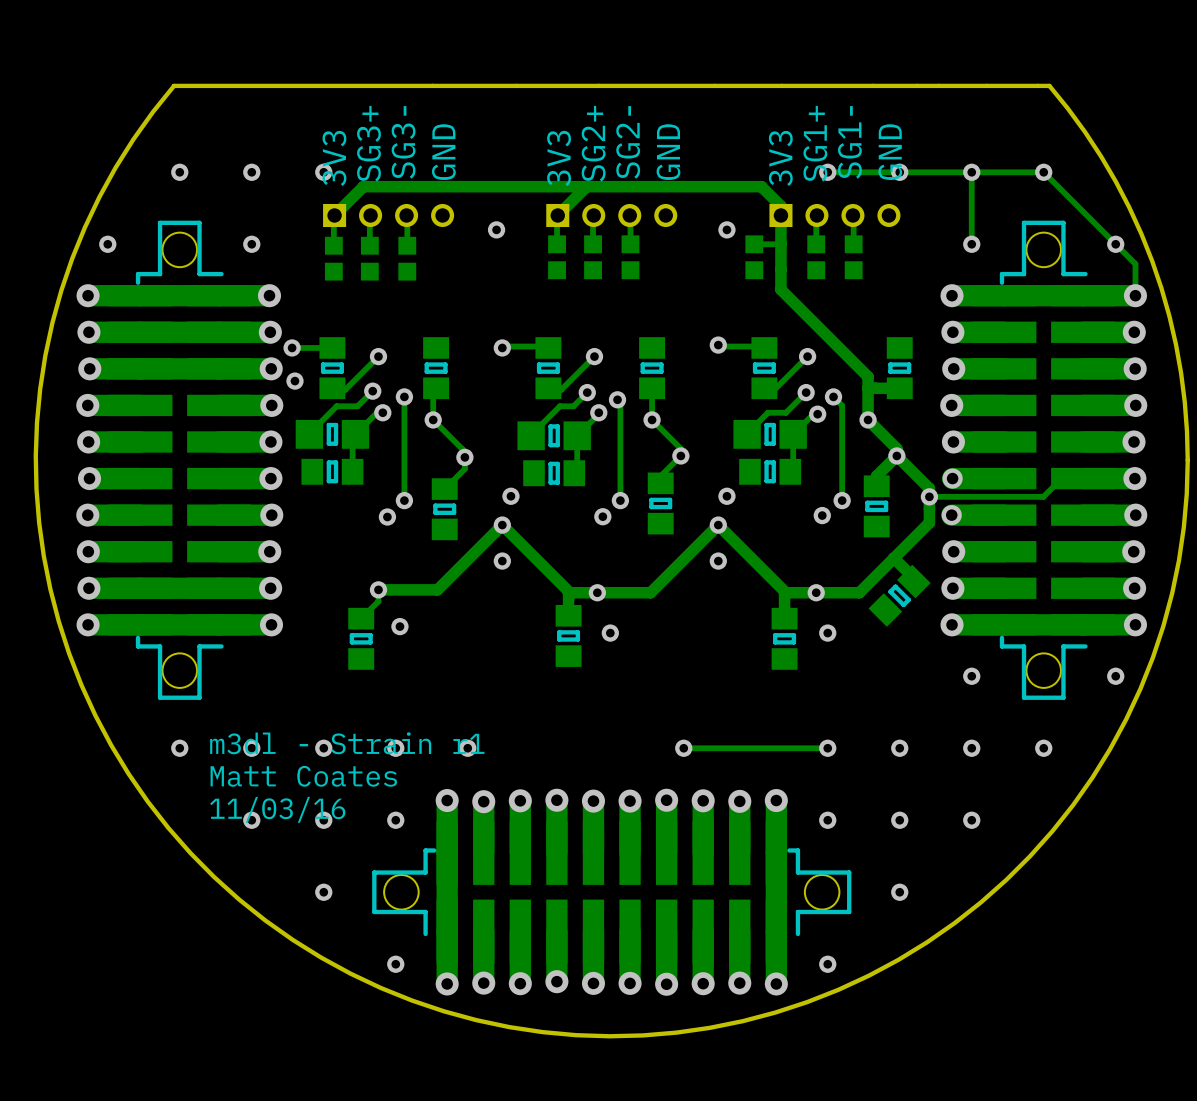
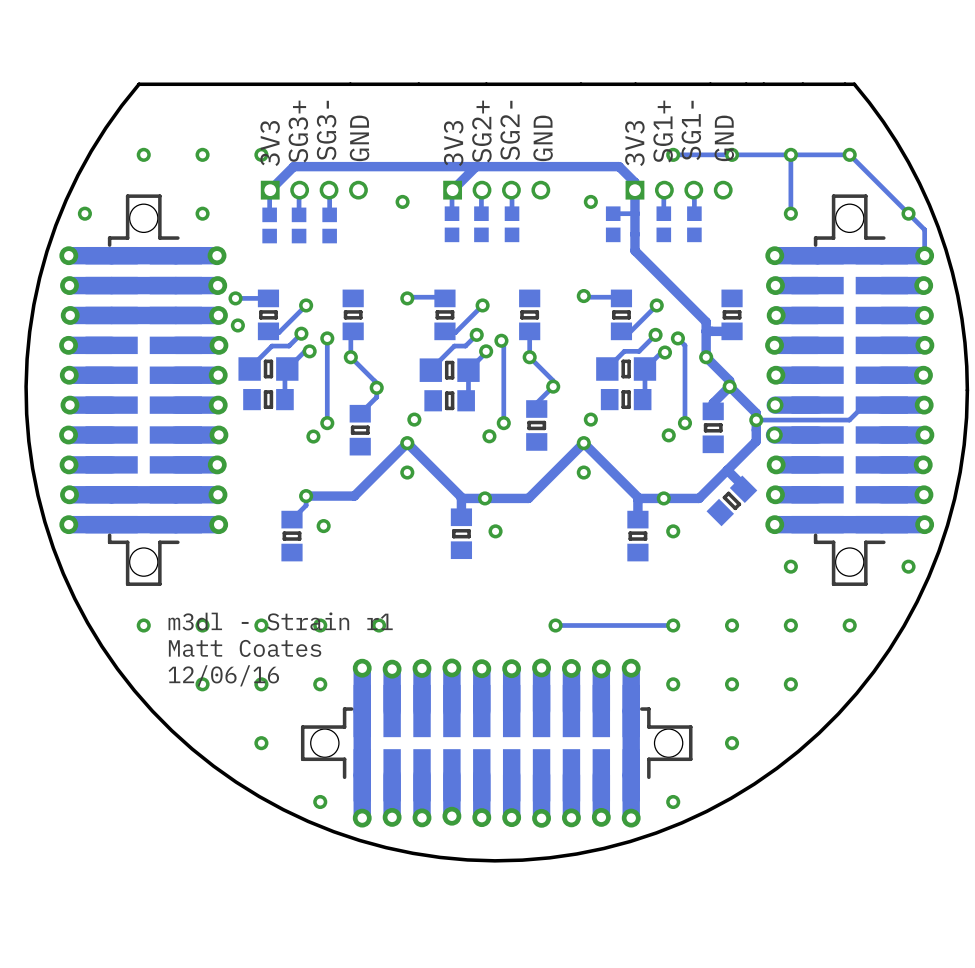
text: 11/03/16 (277, 809) -> 12/06/16 (223, 675)

